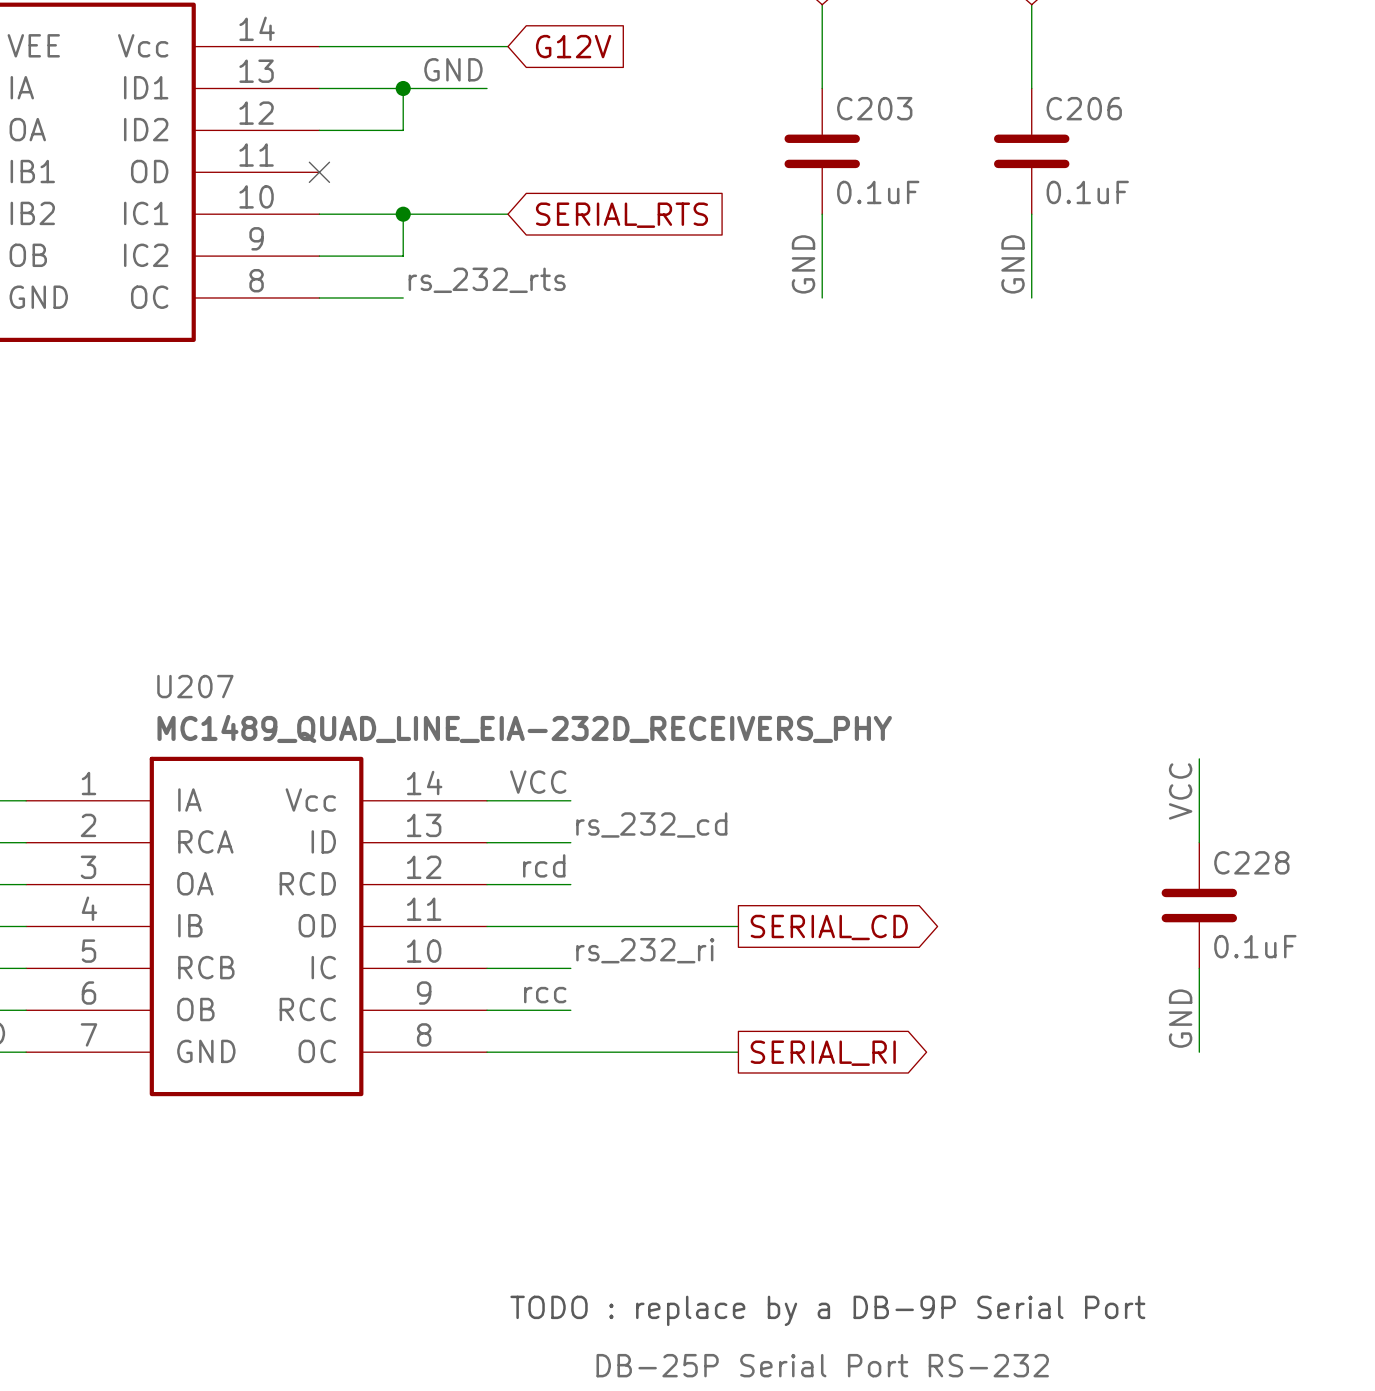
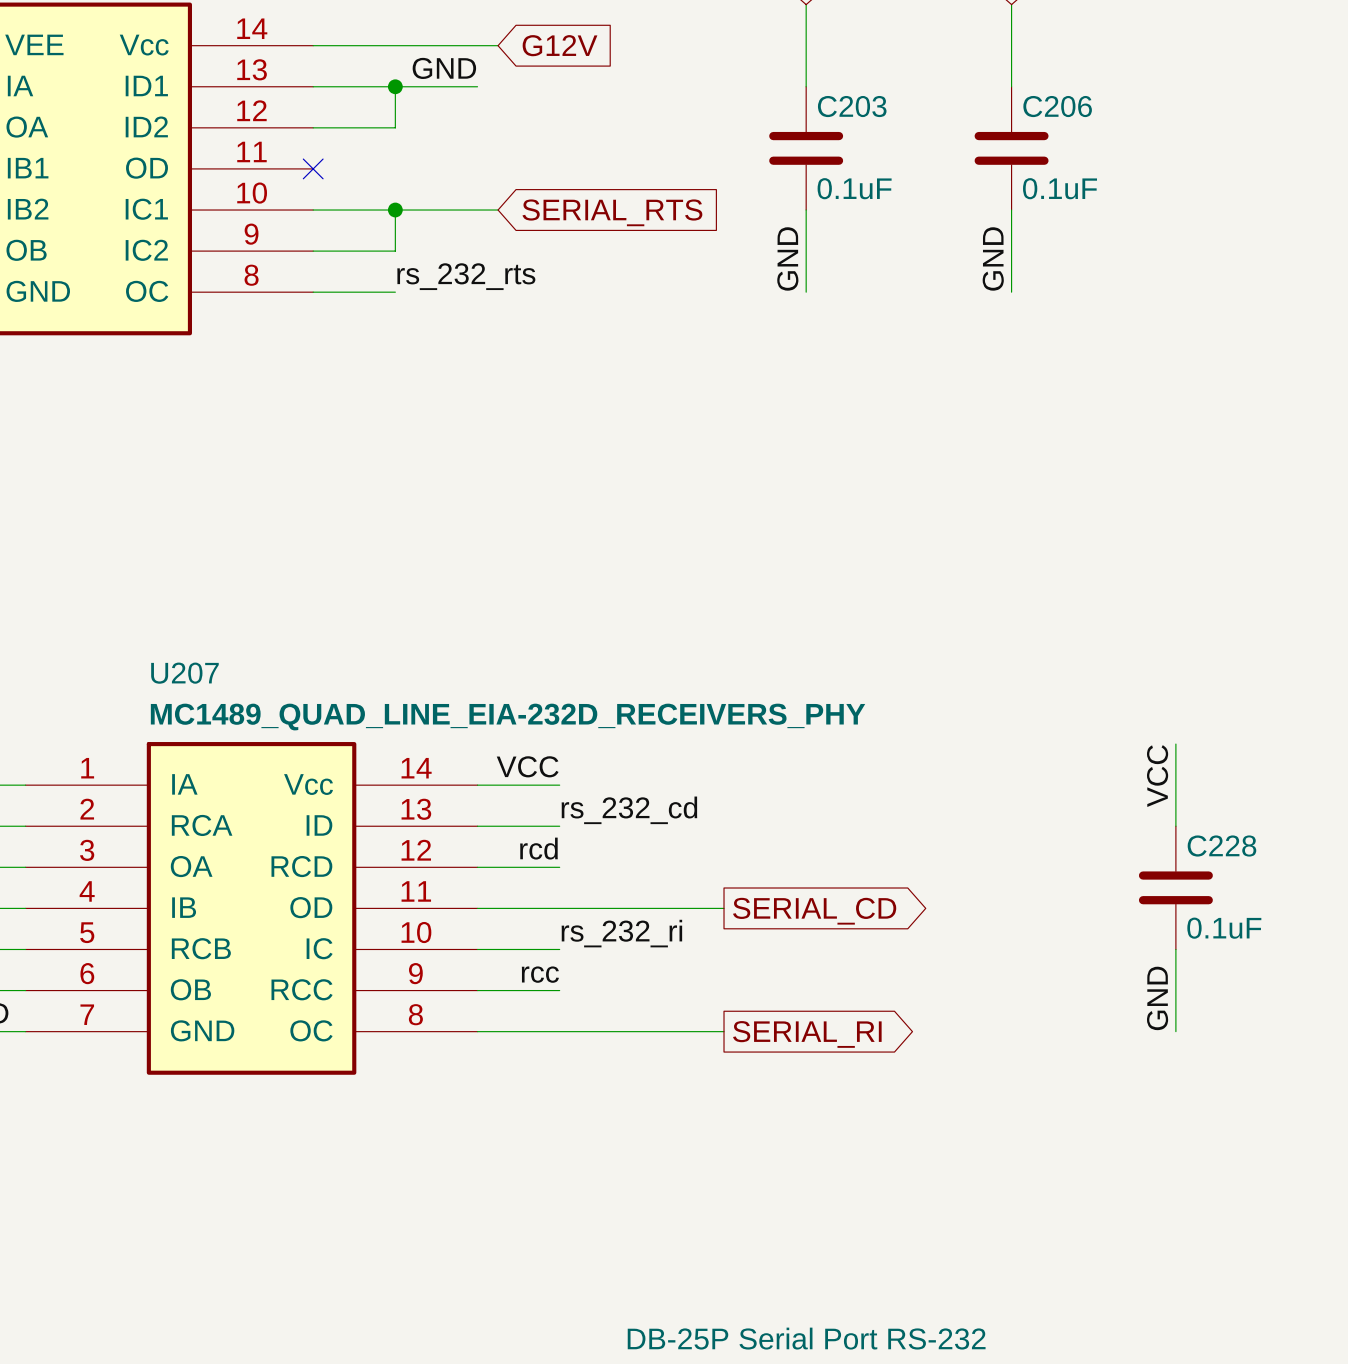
text: TODO : replace by a DB-9P Serial Port (827, 1310) -> none

